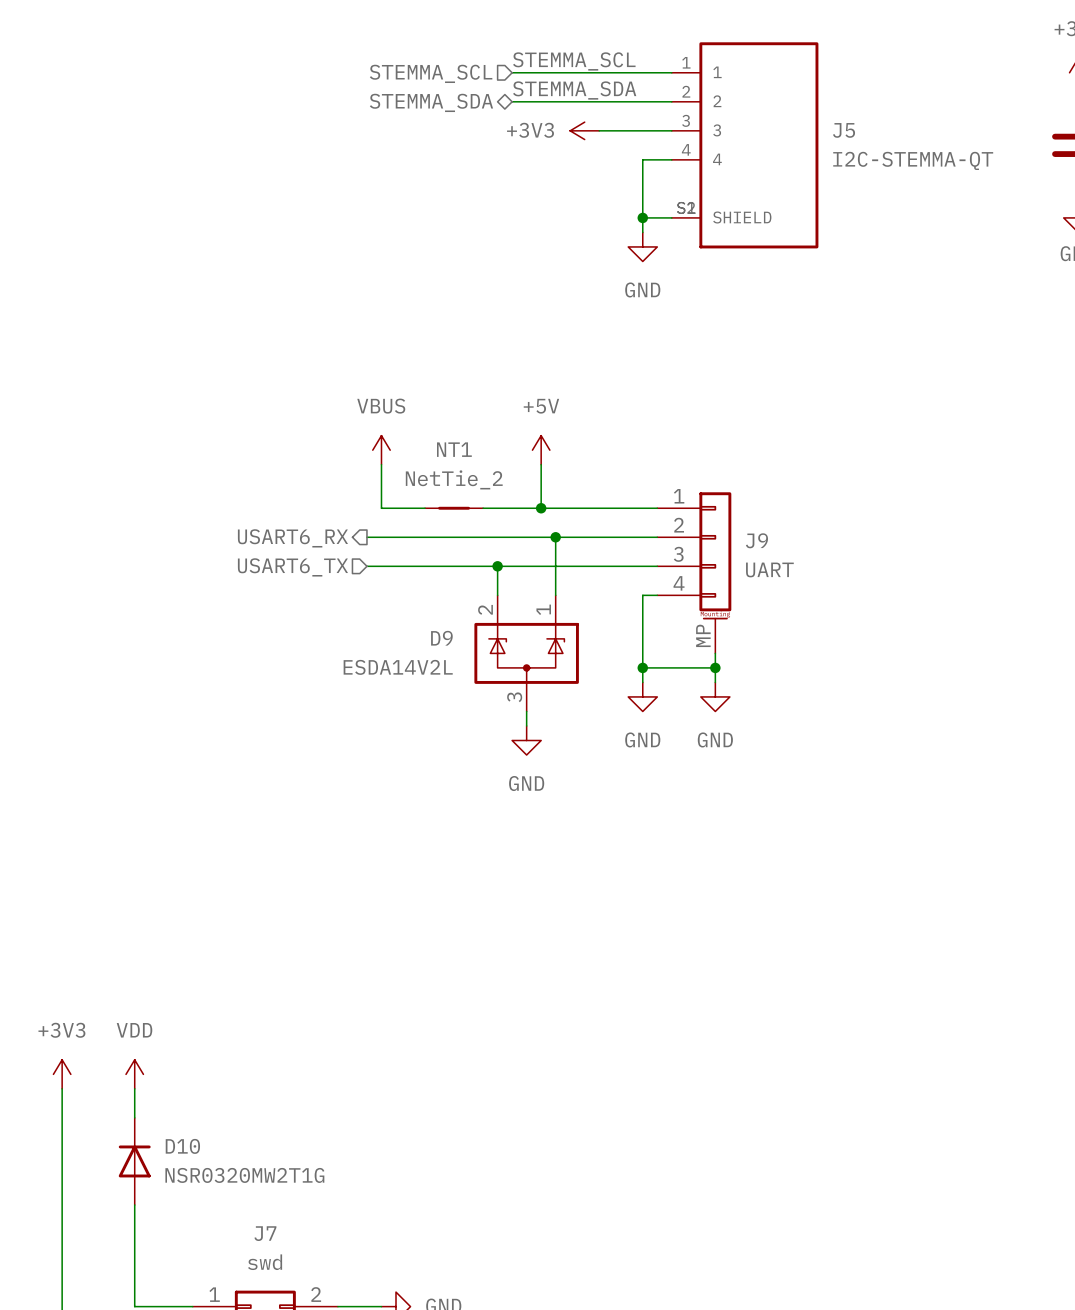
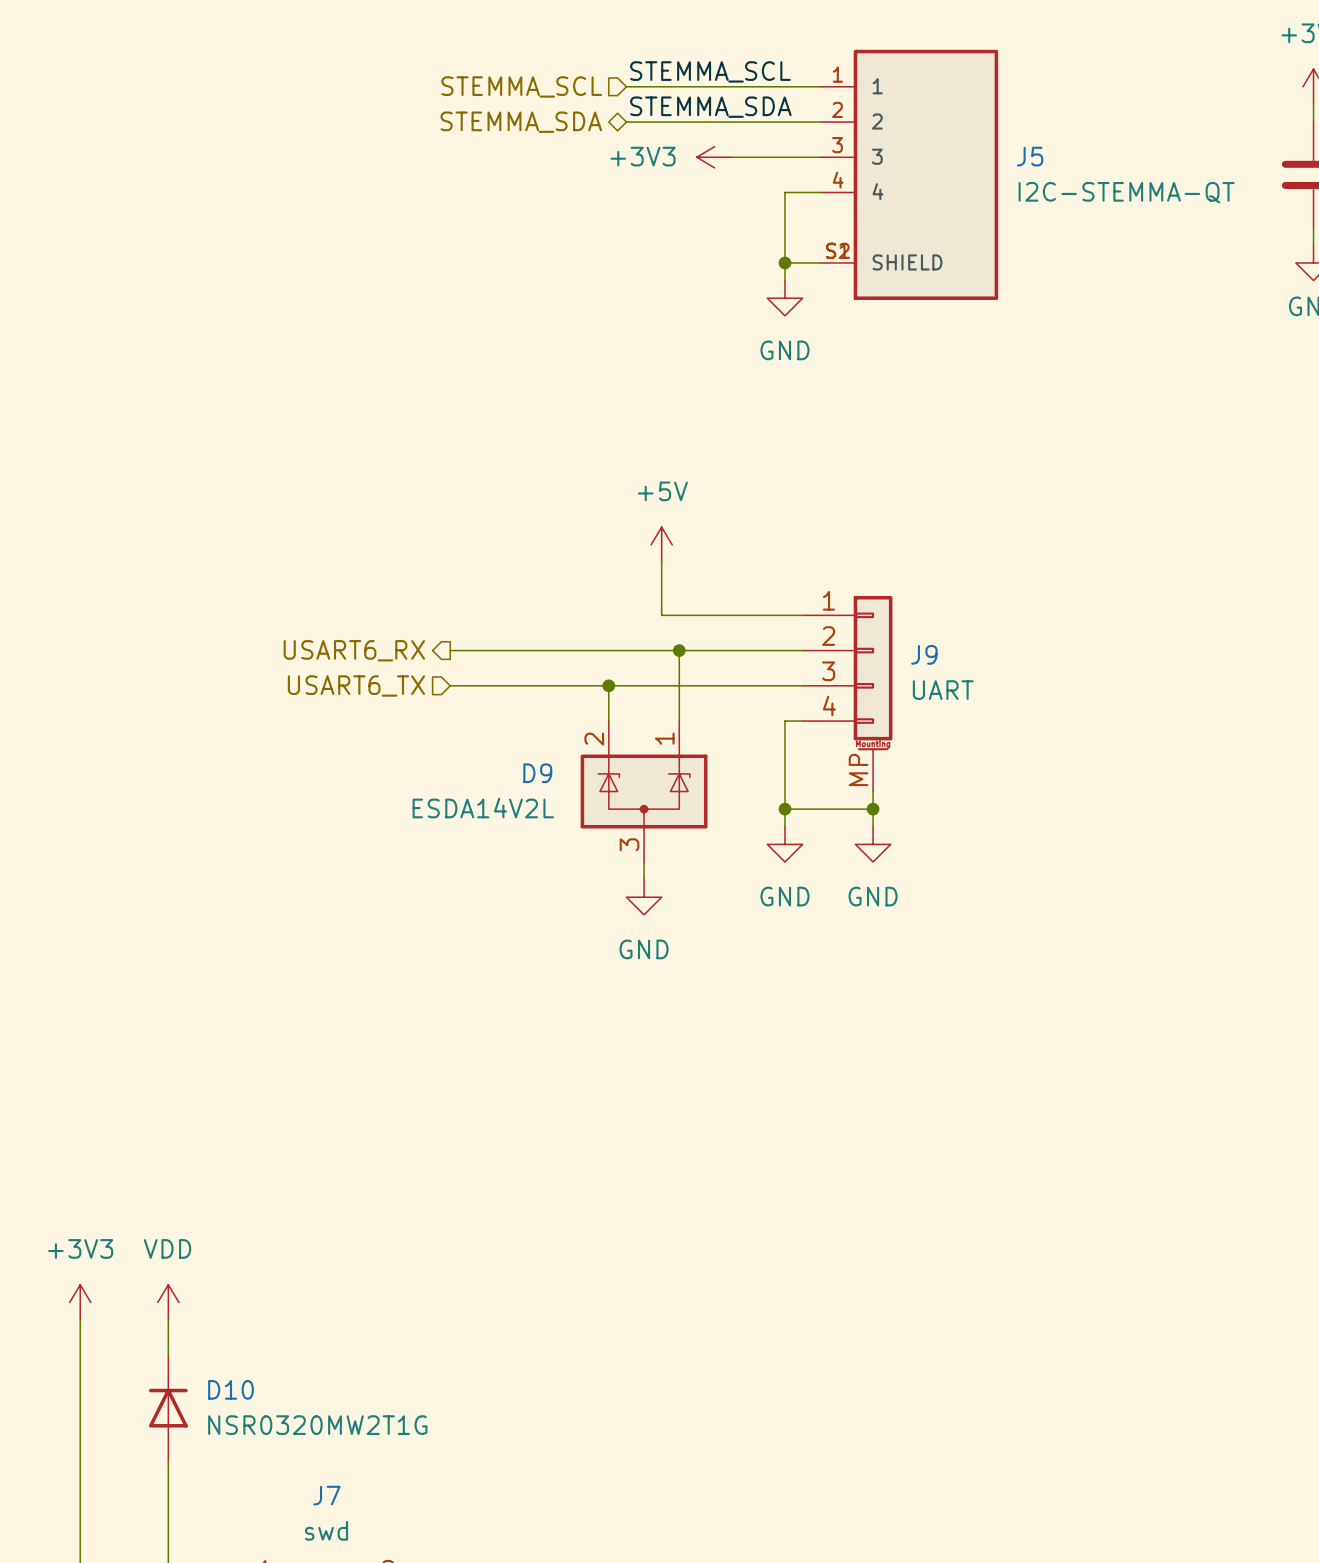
power symbol: VBUS (381, 450) -> none
wire: (381, 464) (381, 508) (425, 508) -> none
NT1: NetTie_2 (454, 508) -> none
wire: (483, 508) (541, 508) -> none
junction: (541, 508) -> none

